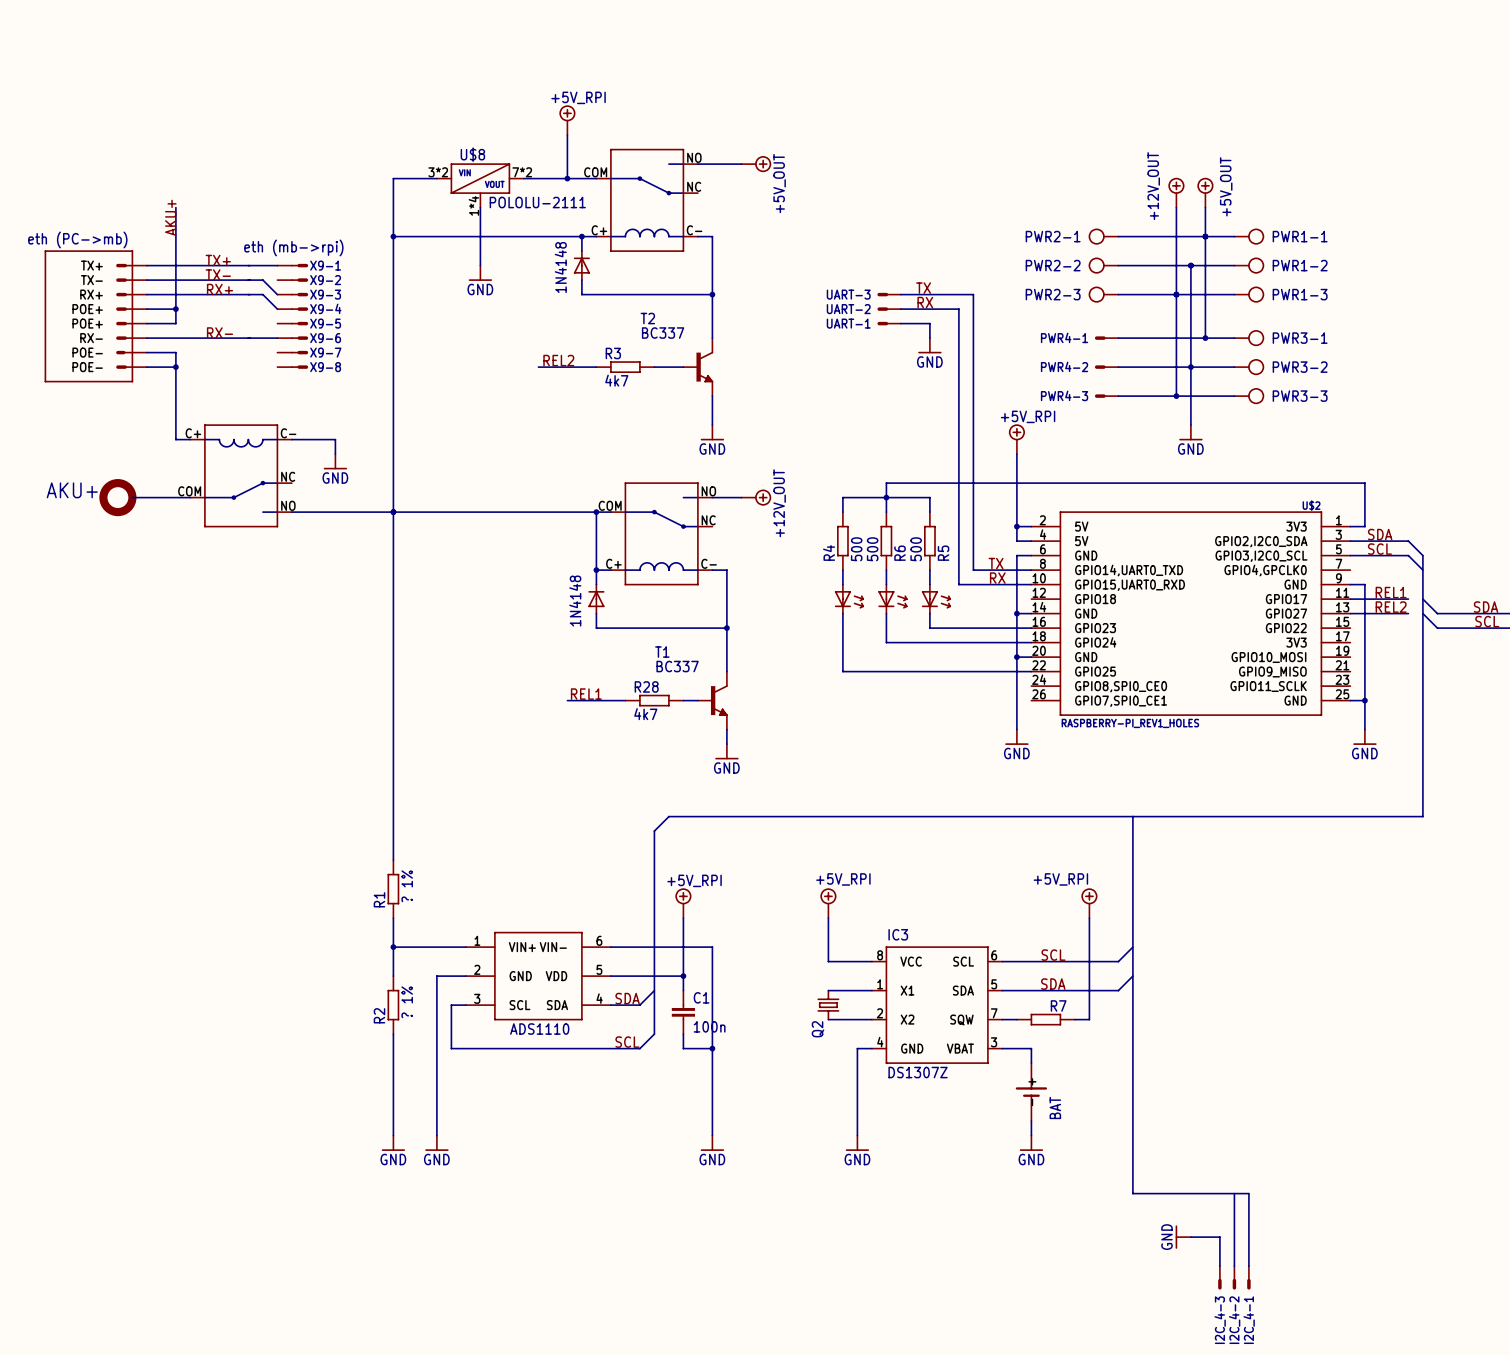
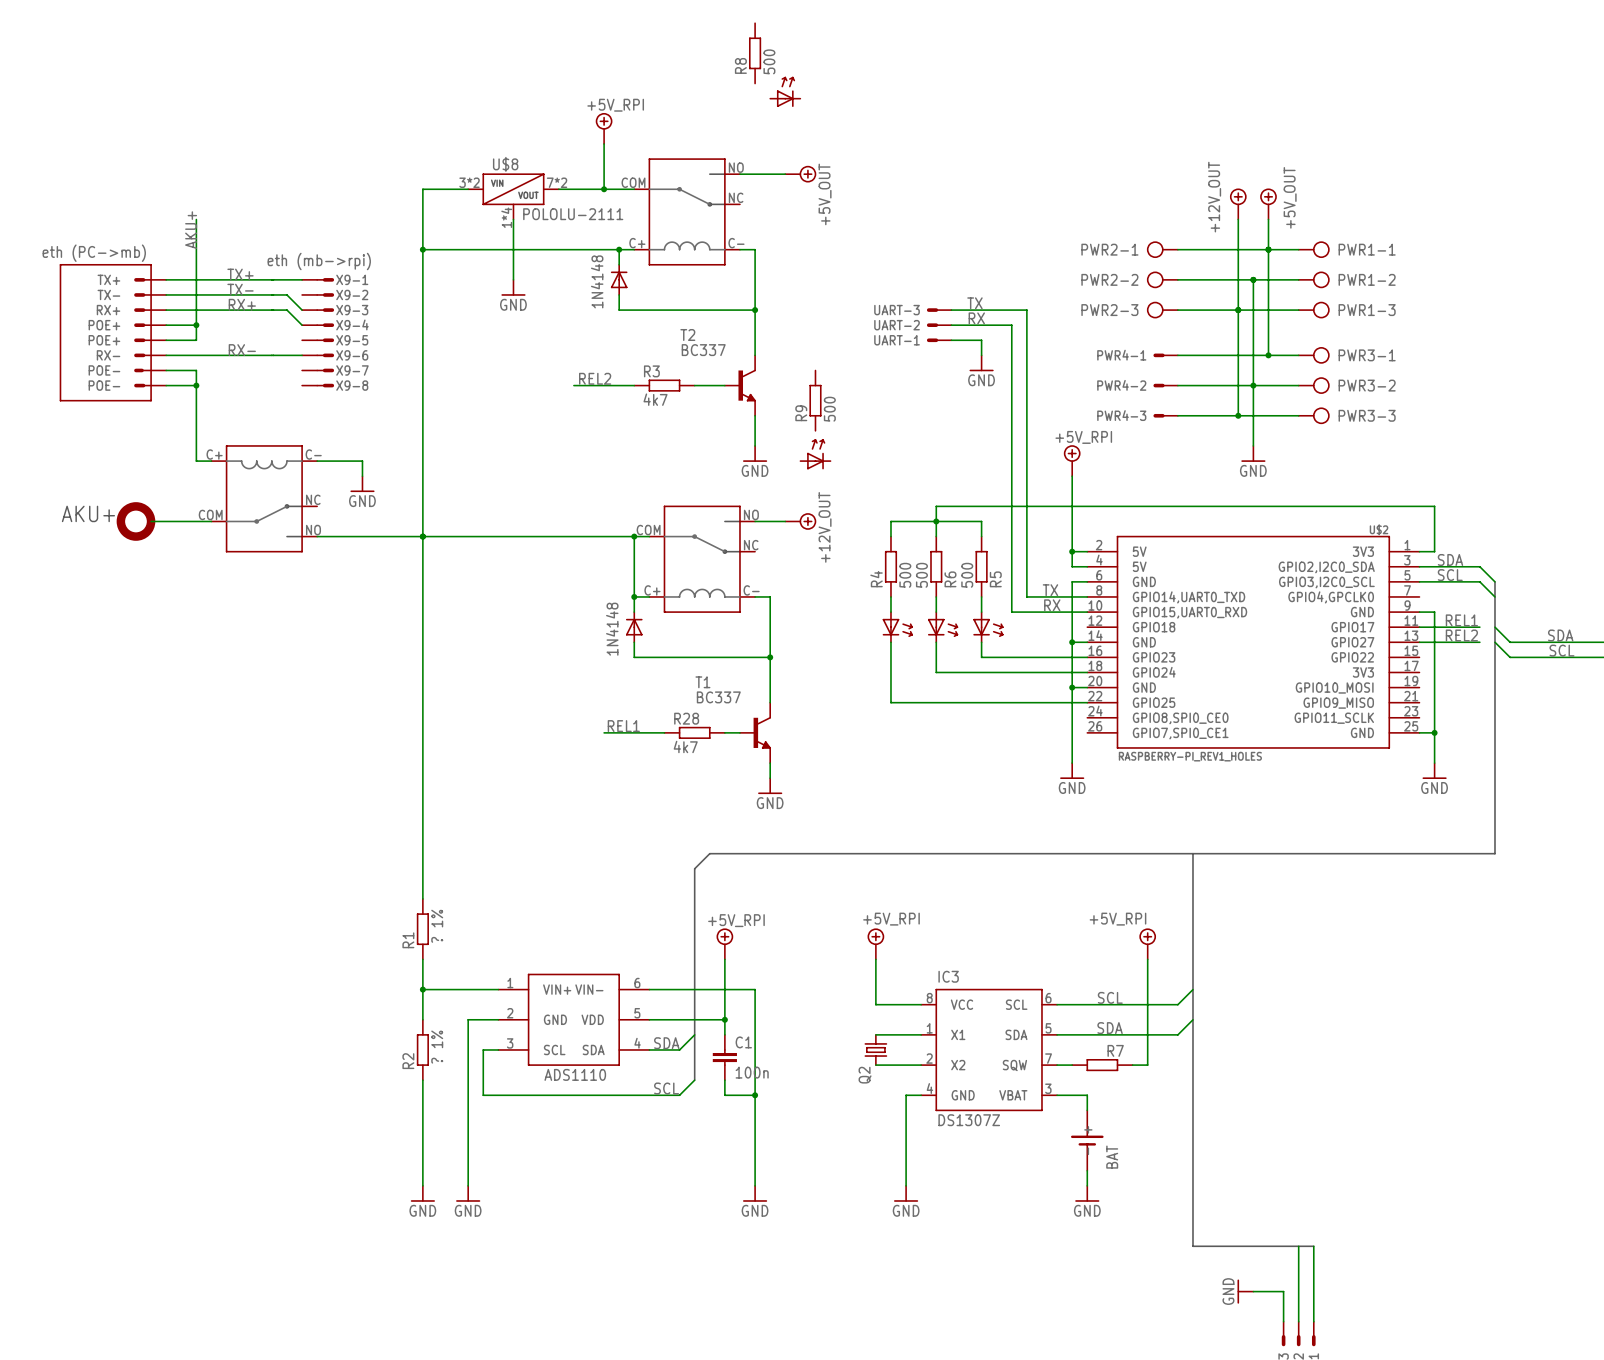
R8: none -> 500 (755, 53)
part: none -> (785, 91)
R9: none -> 500 (815, 400)
part: none -> (815, 454)

